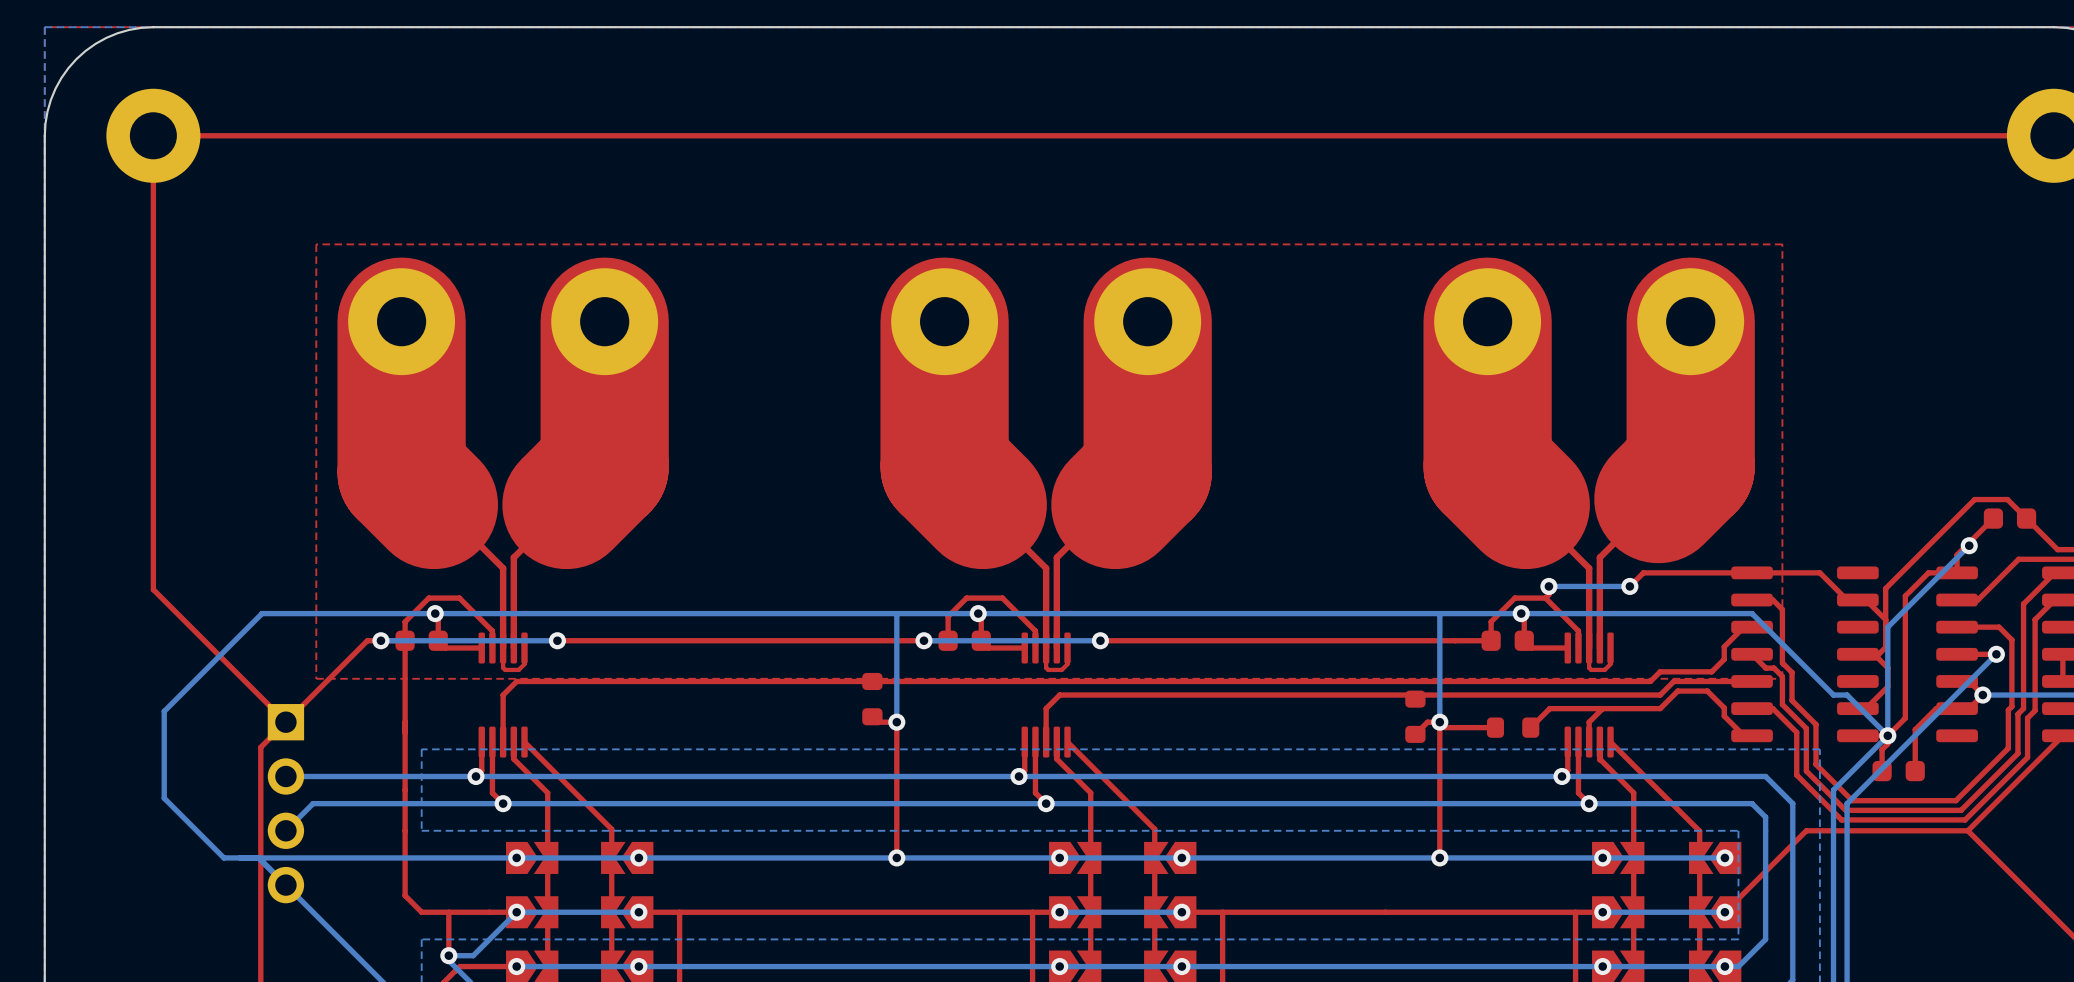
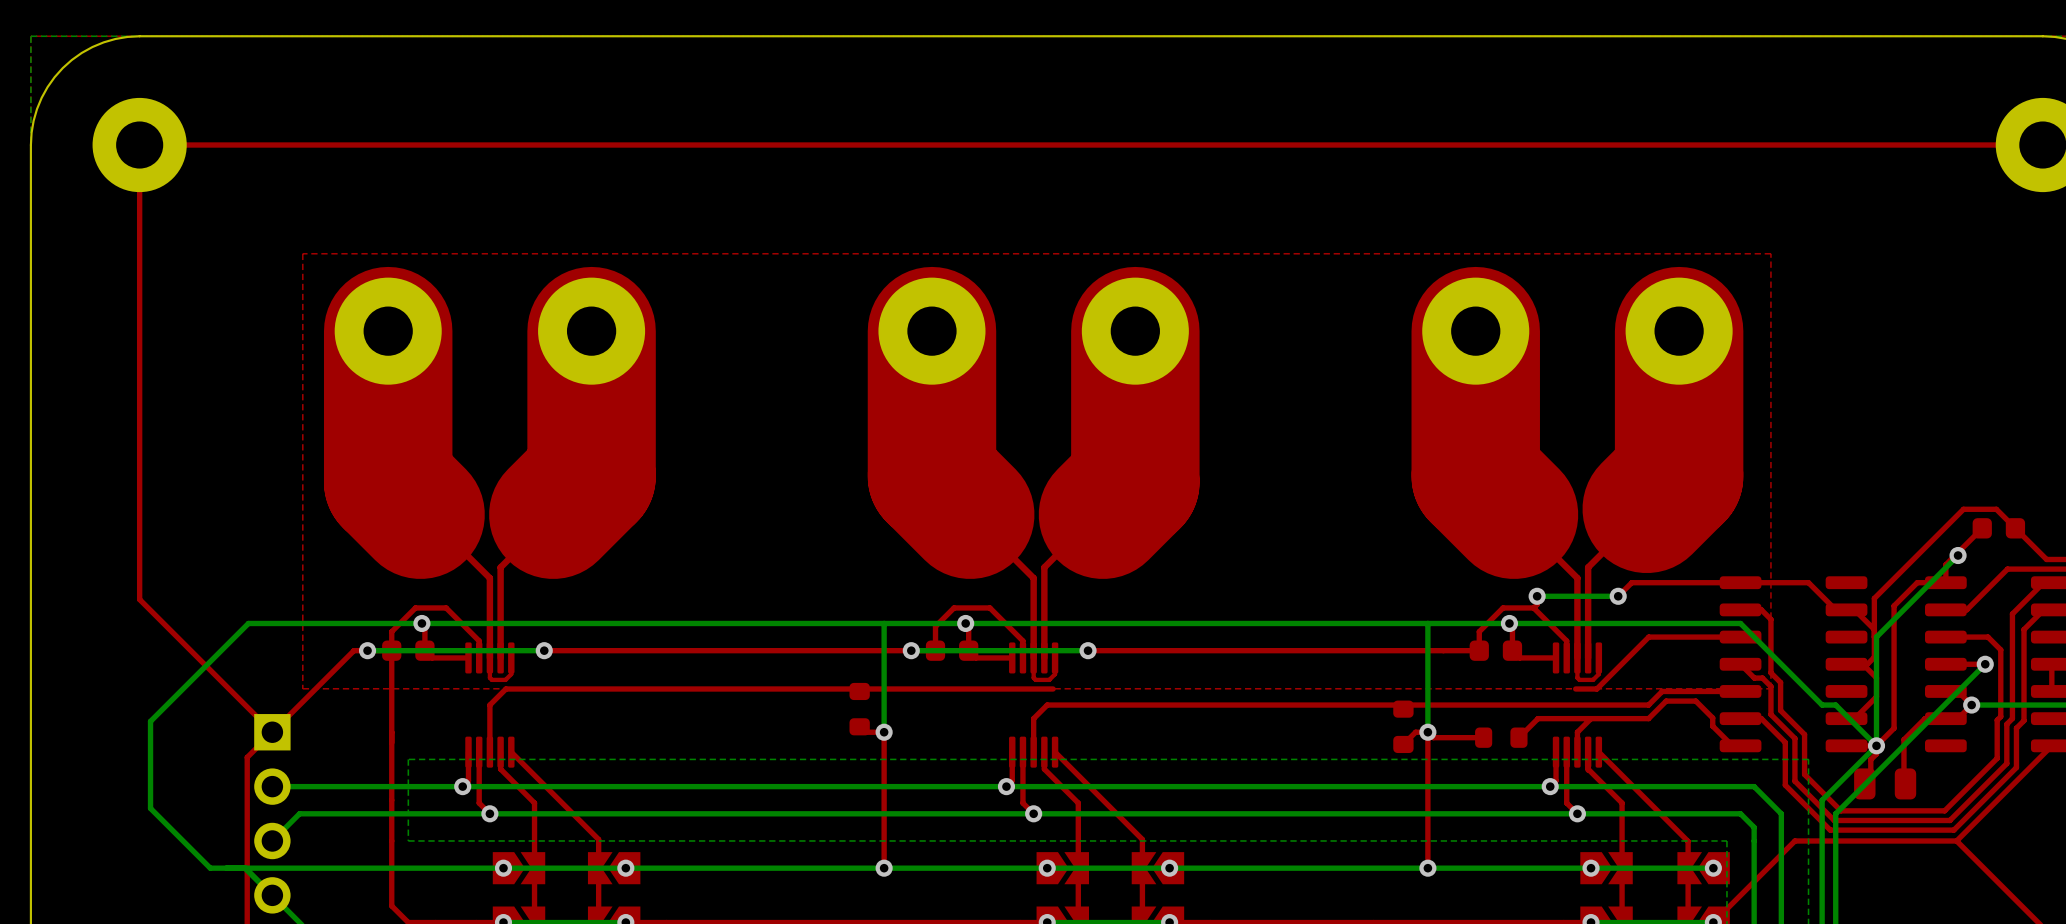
top track: (1743, 627) (1724, 646) (1724, 659) (1711, 671) (1660, 671) (1650, 681) (516, 681) -> (1053, 688) (505, 688) (503, 691)
top track: none -> (1732, 637) (1648, 637) (1596, 688) (1575, 688)
part footprint: [1872, 760, 1925, 782] -> [1854, 768, 1917, 800]

